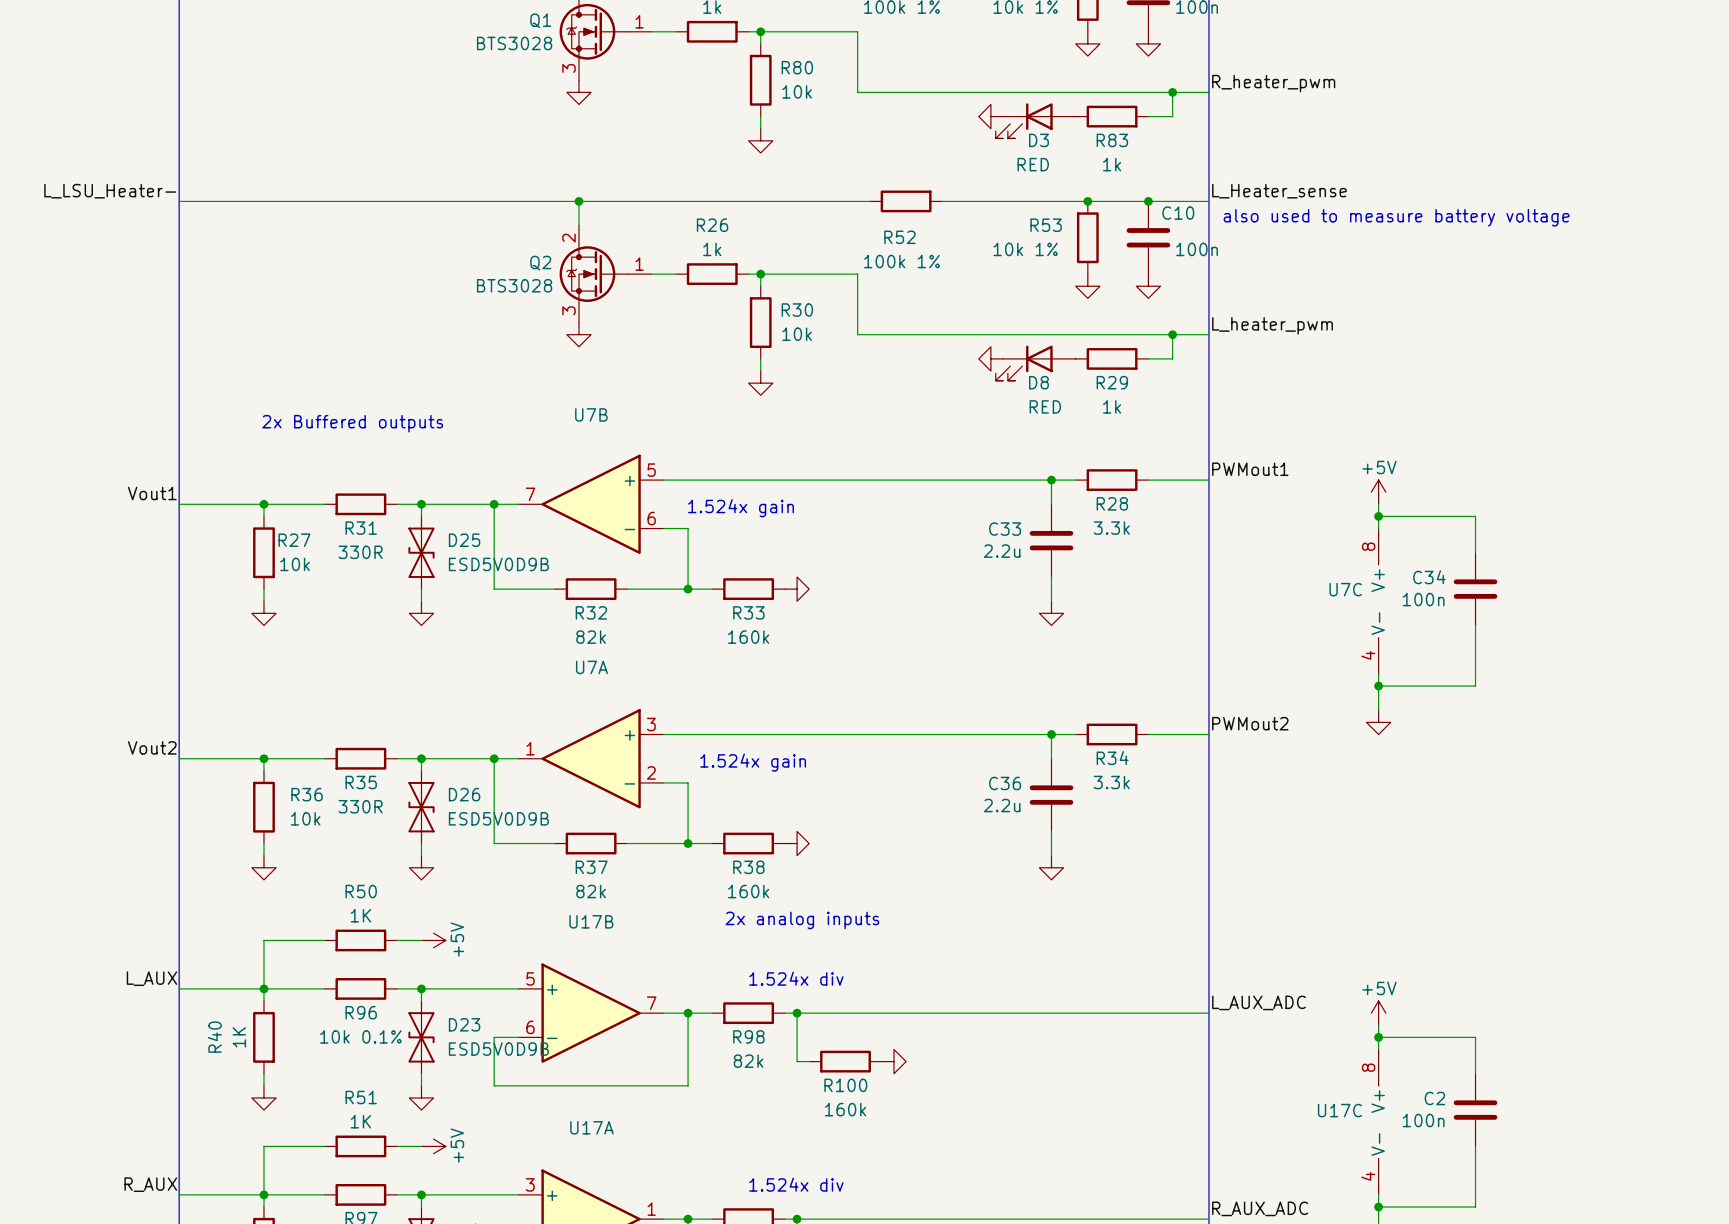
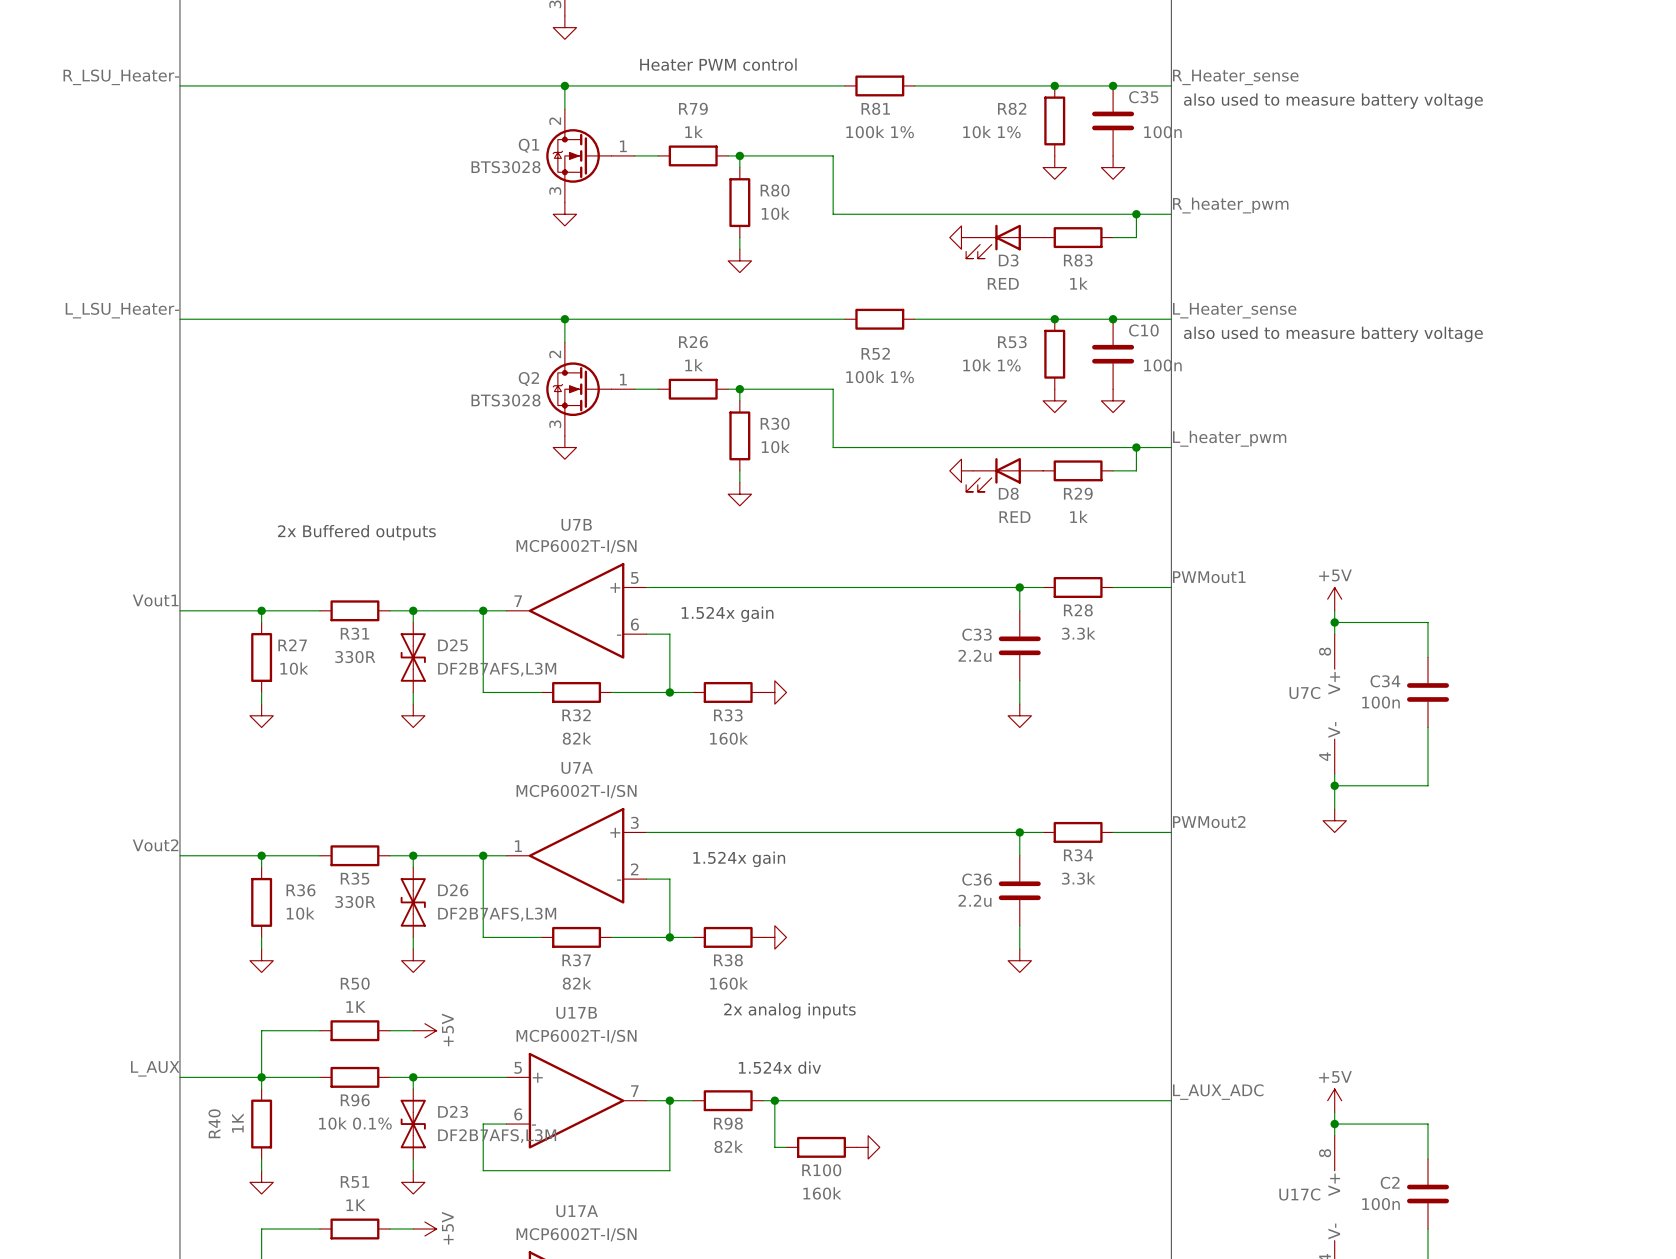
U7B value: none -> MCP6002T-I/SN (576, 546)
D25 value: ESD5V0D9B (498, 564) -> DF2B7AFS,L3M (497, 669)
U7A value: none -> MCP6002T-I/SN (576, 791)
D26 value: ESD5V0D9B (498, 818) -> DF2B7AFS,L3M (497, 914)
U17B value: none -> MCP6002T-I/SN (576, 1036)
D23 value: ESD5V0D9B (498, 1049) -> DF2B7AFS,L3M (497, 1136)
U17A value: none -> MCP6002T-I/SN (576, 1234)

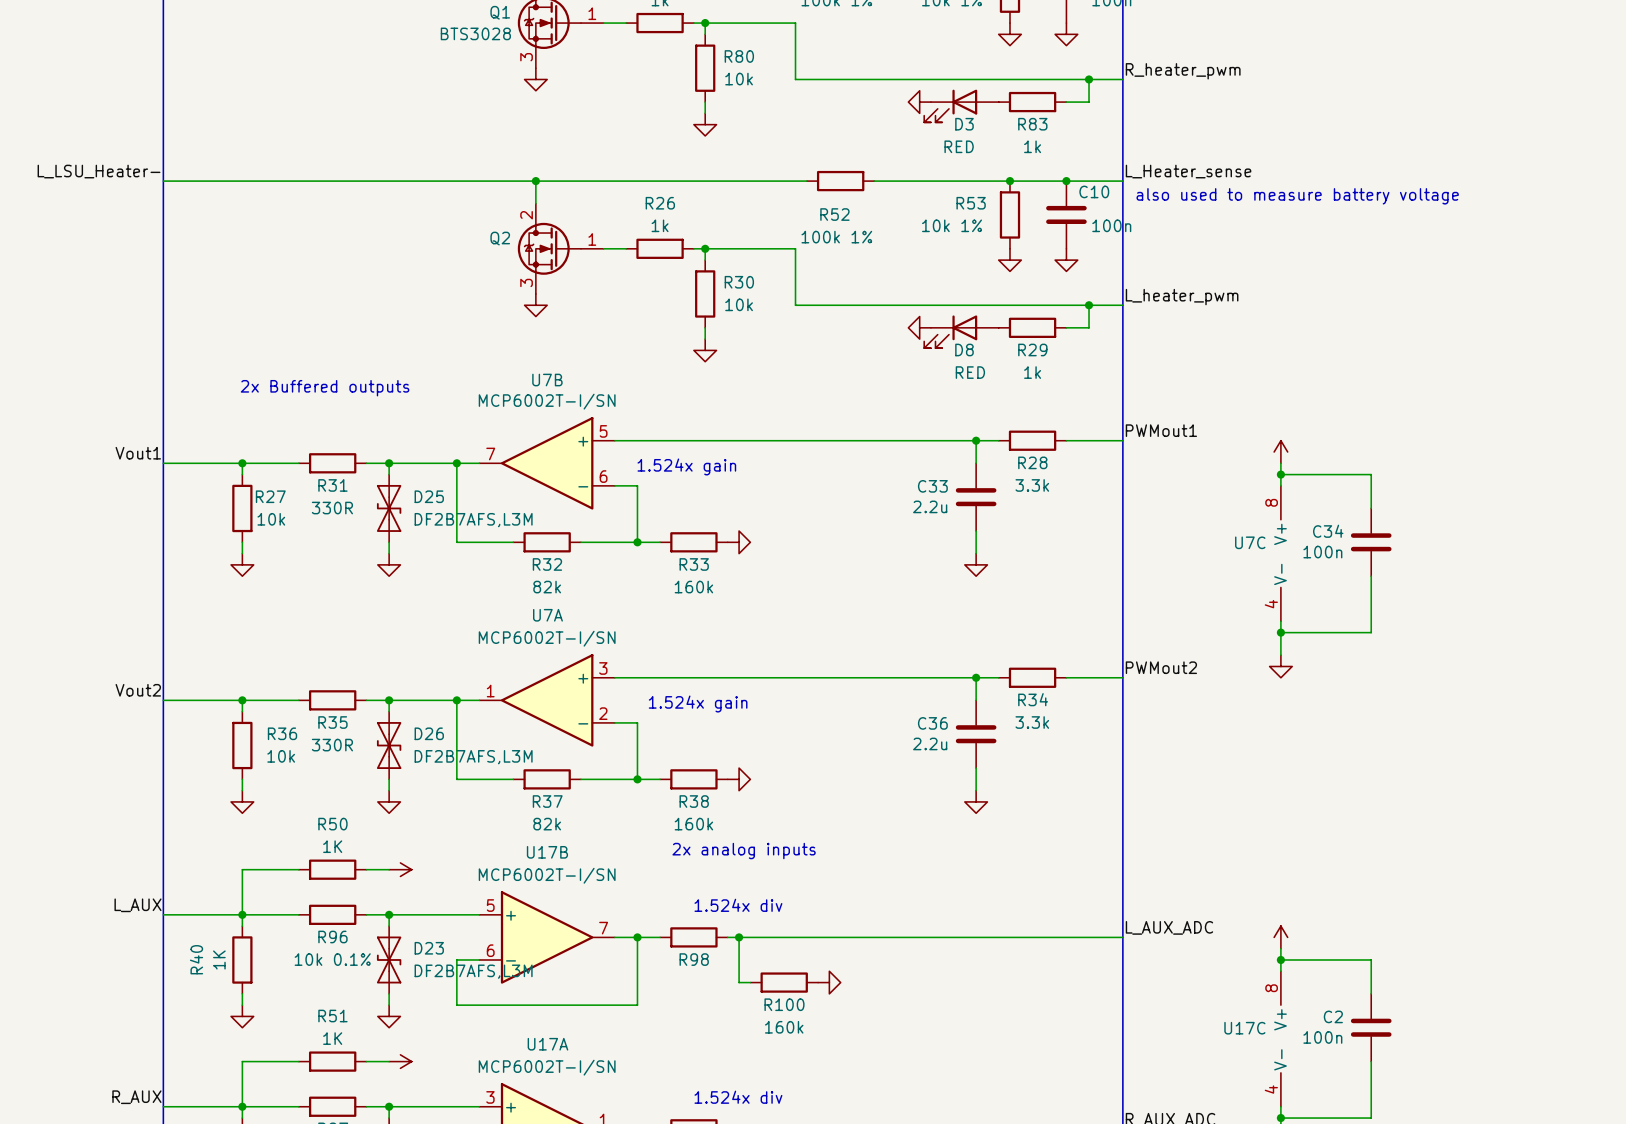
Q2 value: BTS3028 (505, 400) -> none
power symbol text: +5V (1335, 575) -> none
power symbol text: +5V (447, 1029) -> none
power symbol text: +5V (1335, 1077) -> none
R98 value: 82k (728, 1146) -> none
power symbol text: +5V (447, 1228) -> none

